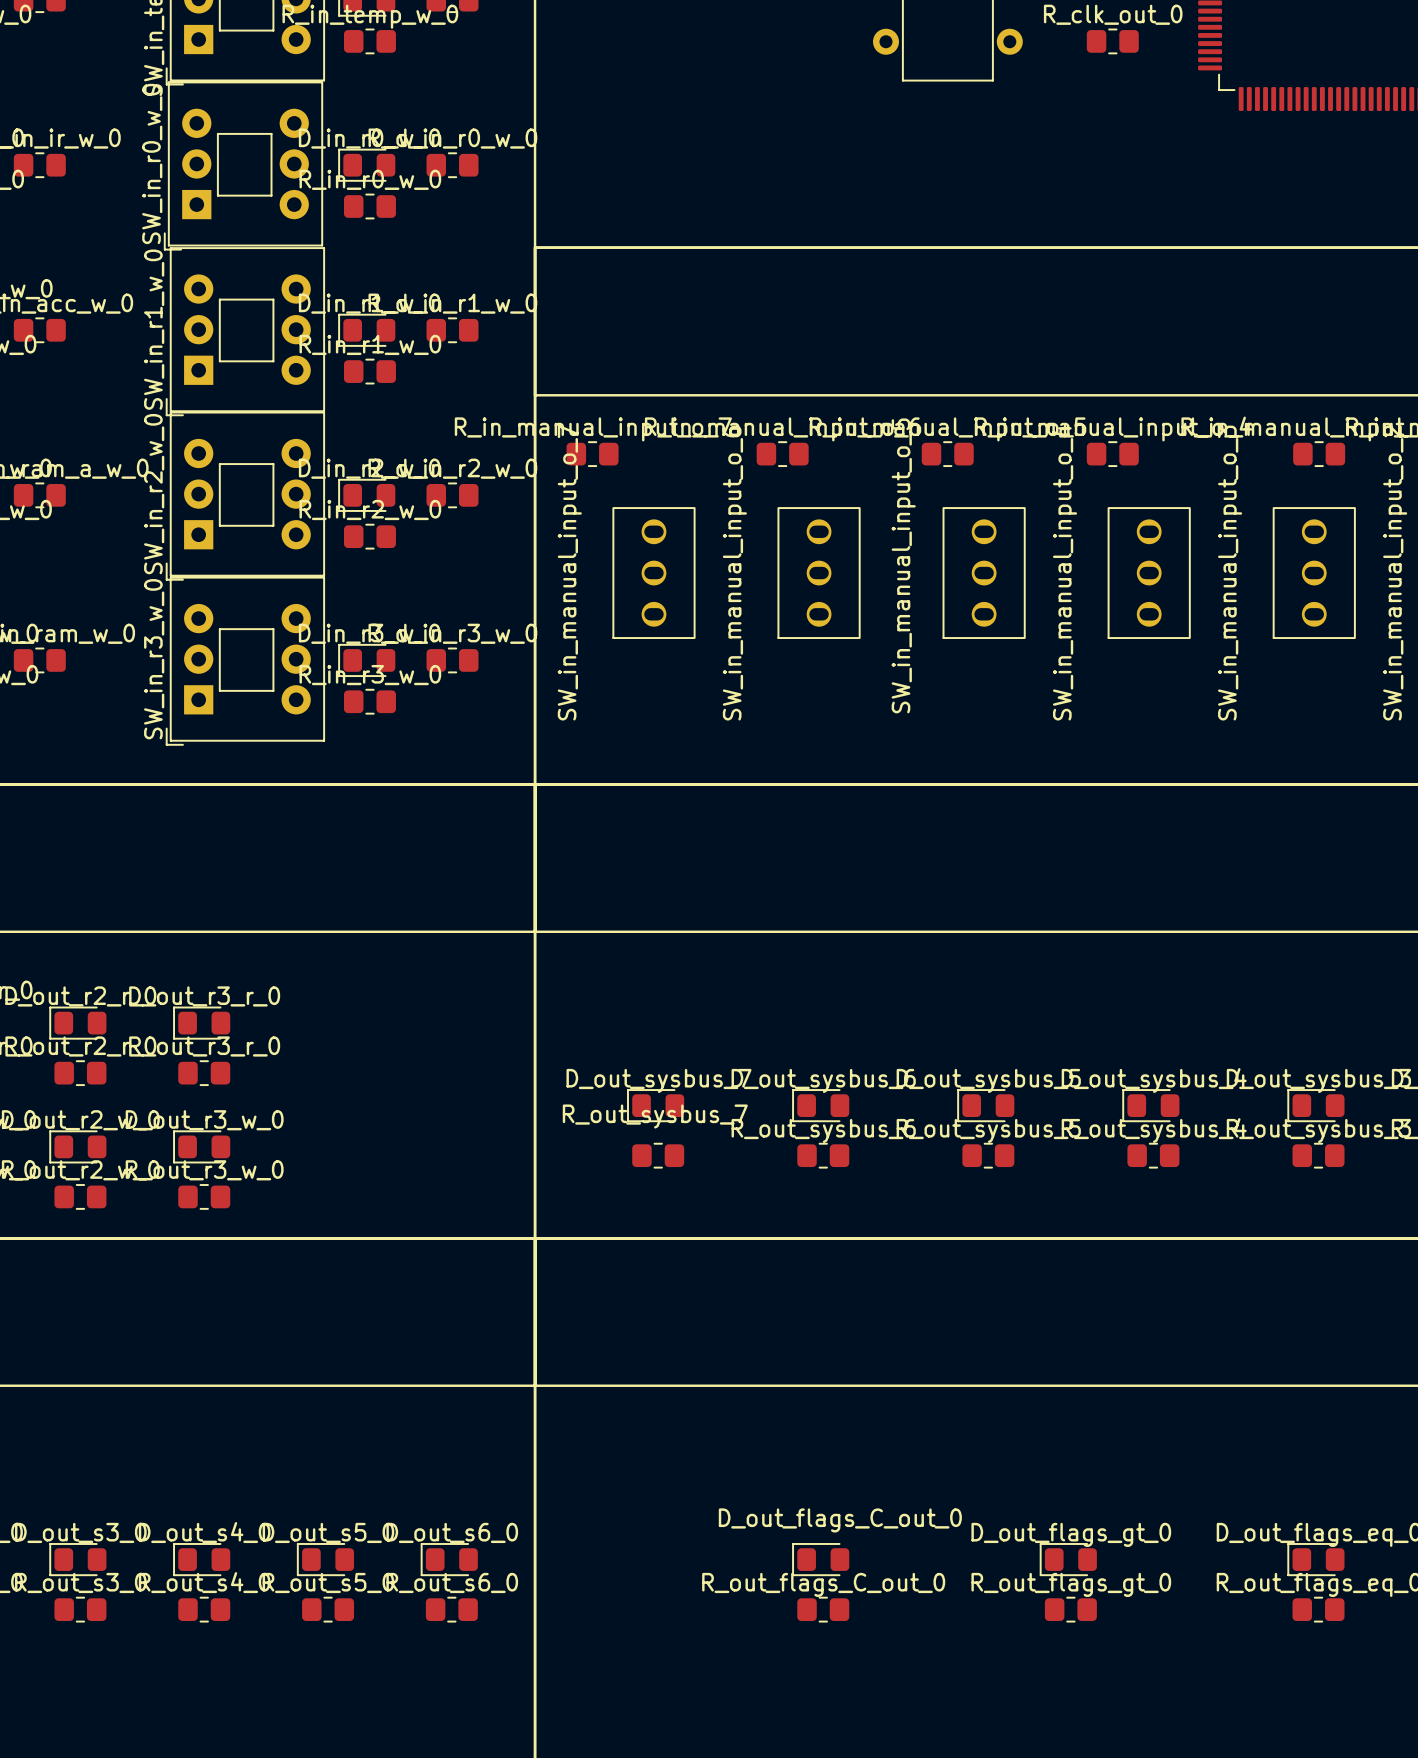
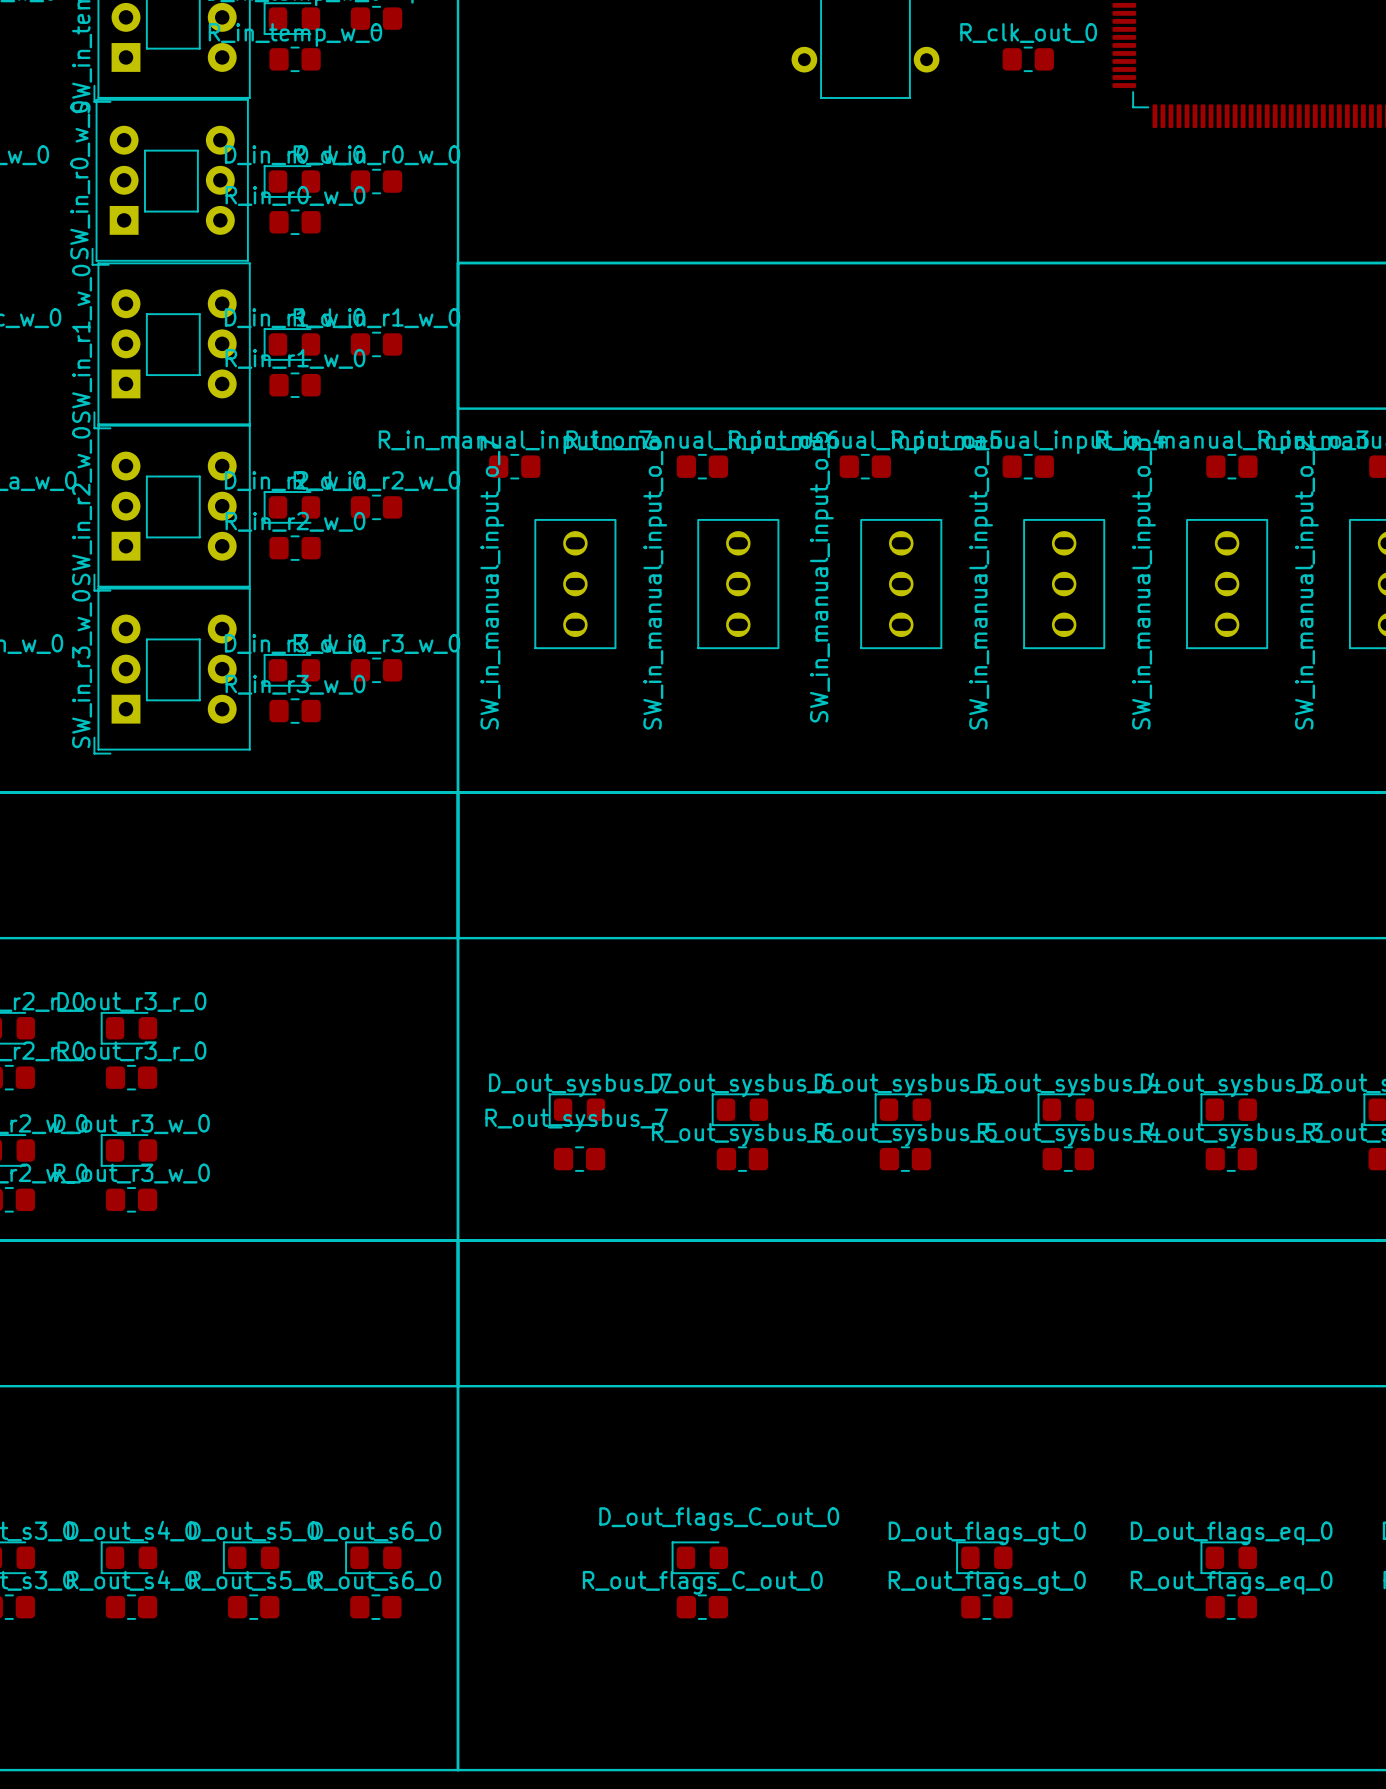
D_out_flags_C_out_0 position: (820, 1559) -> (699, 1557)
R_out_flags_C_out_0 position: (823, 1609) -> (702, 1607)

